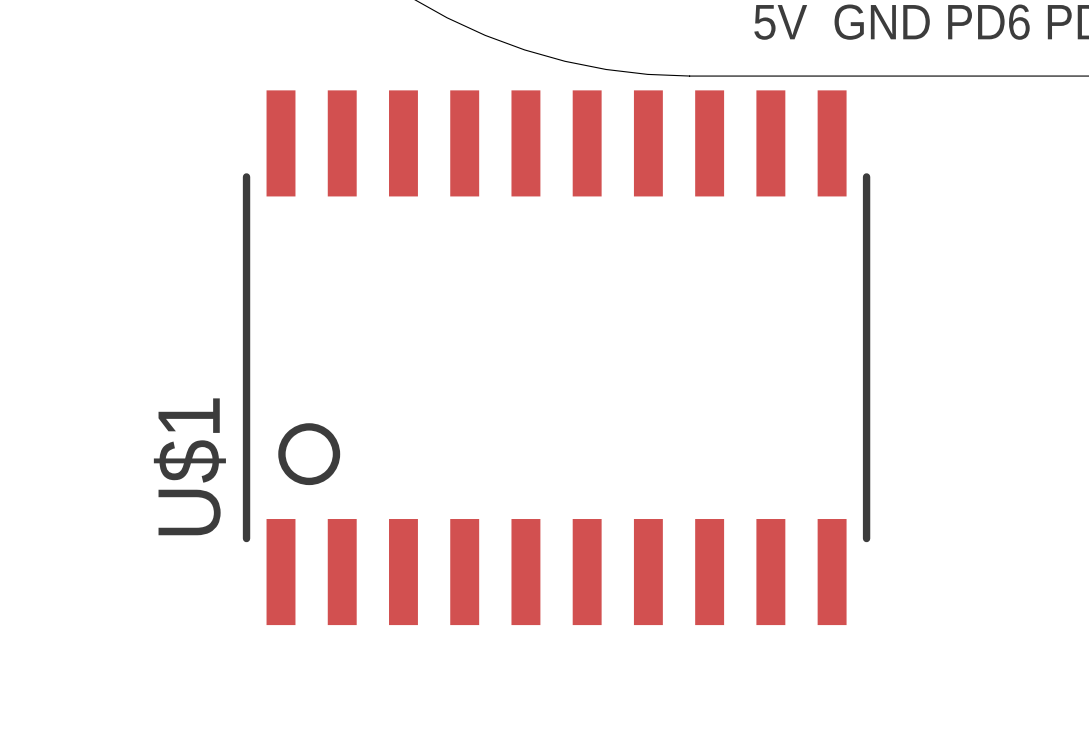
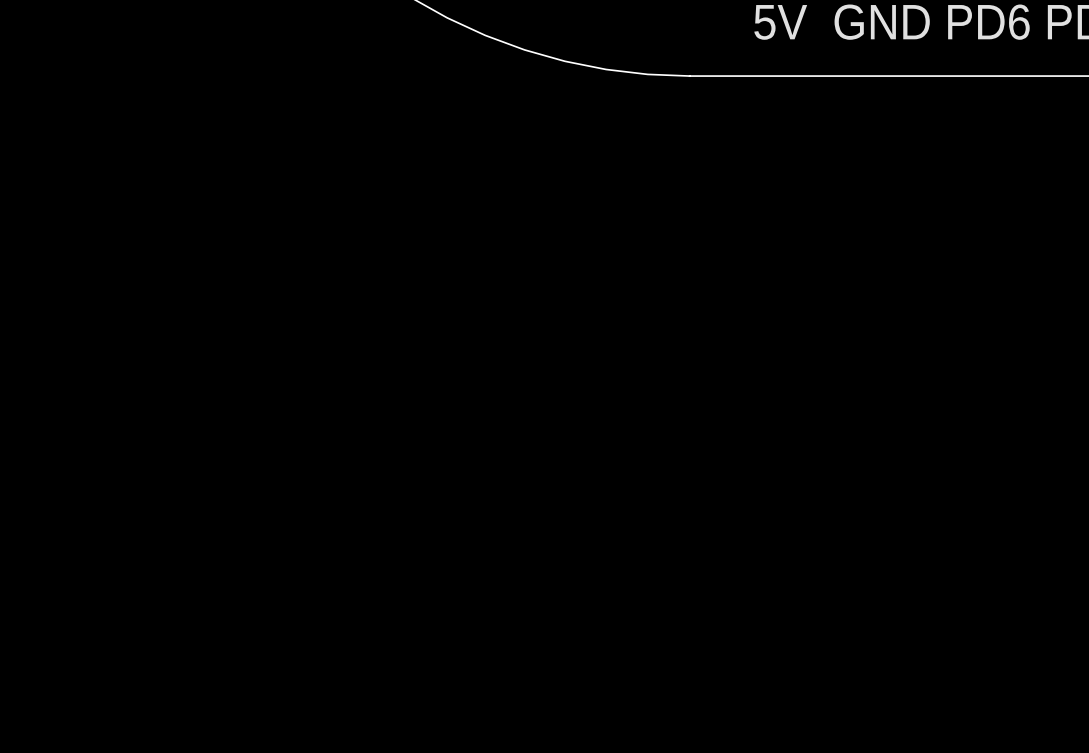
U$1: (556, 357) -> none

